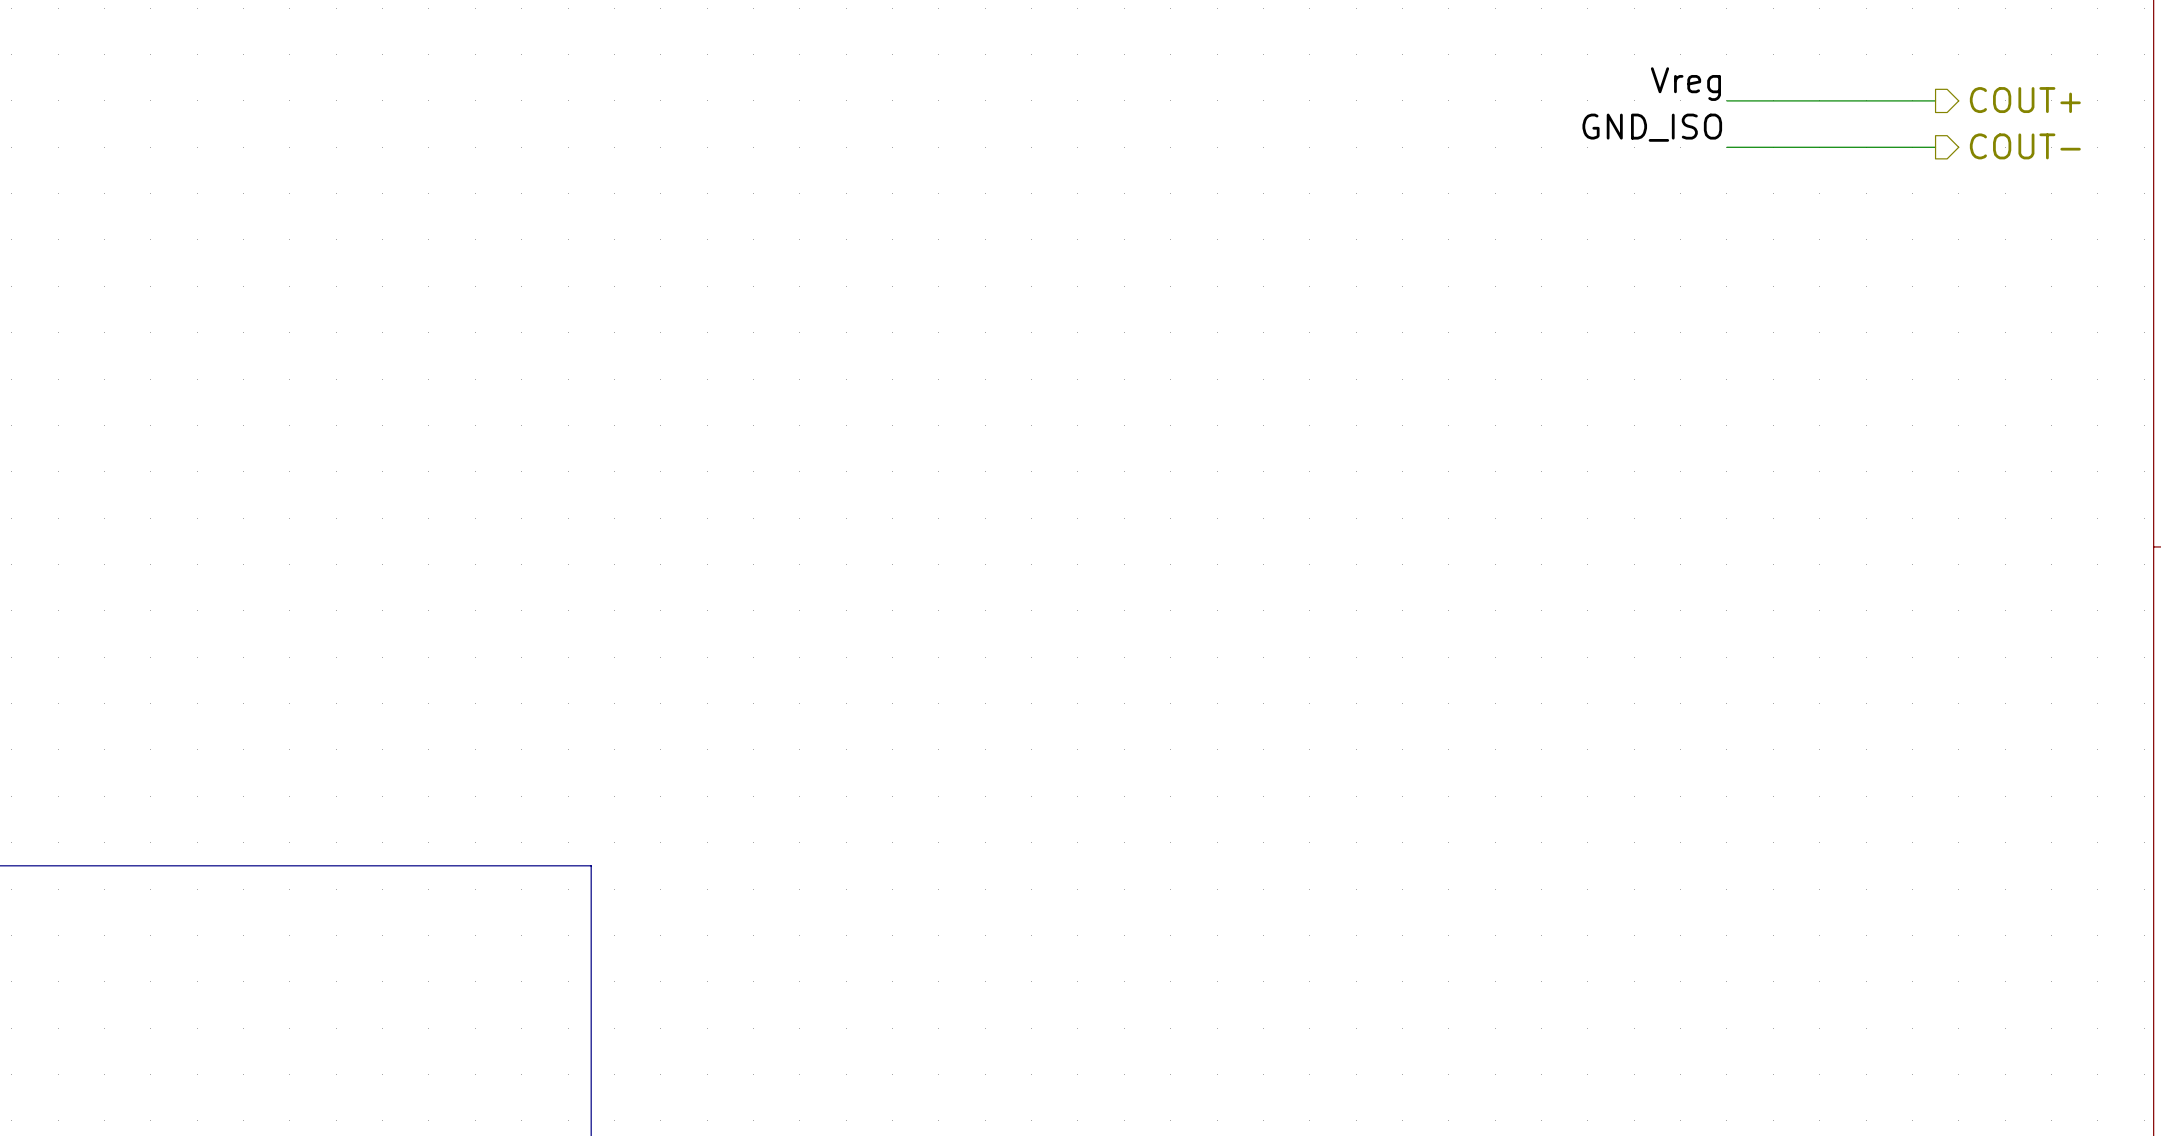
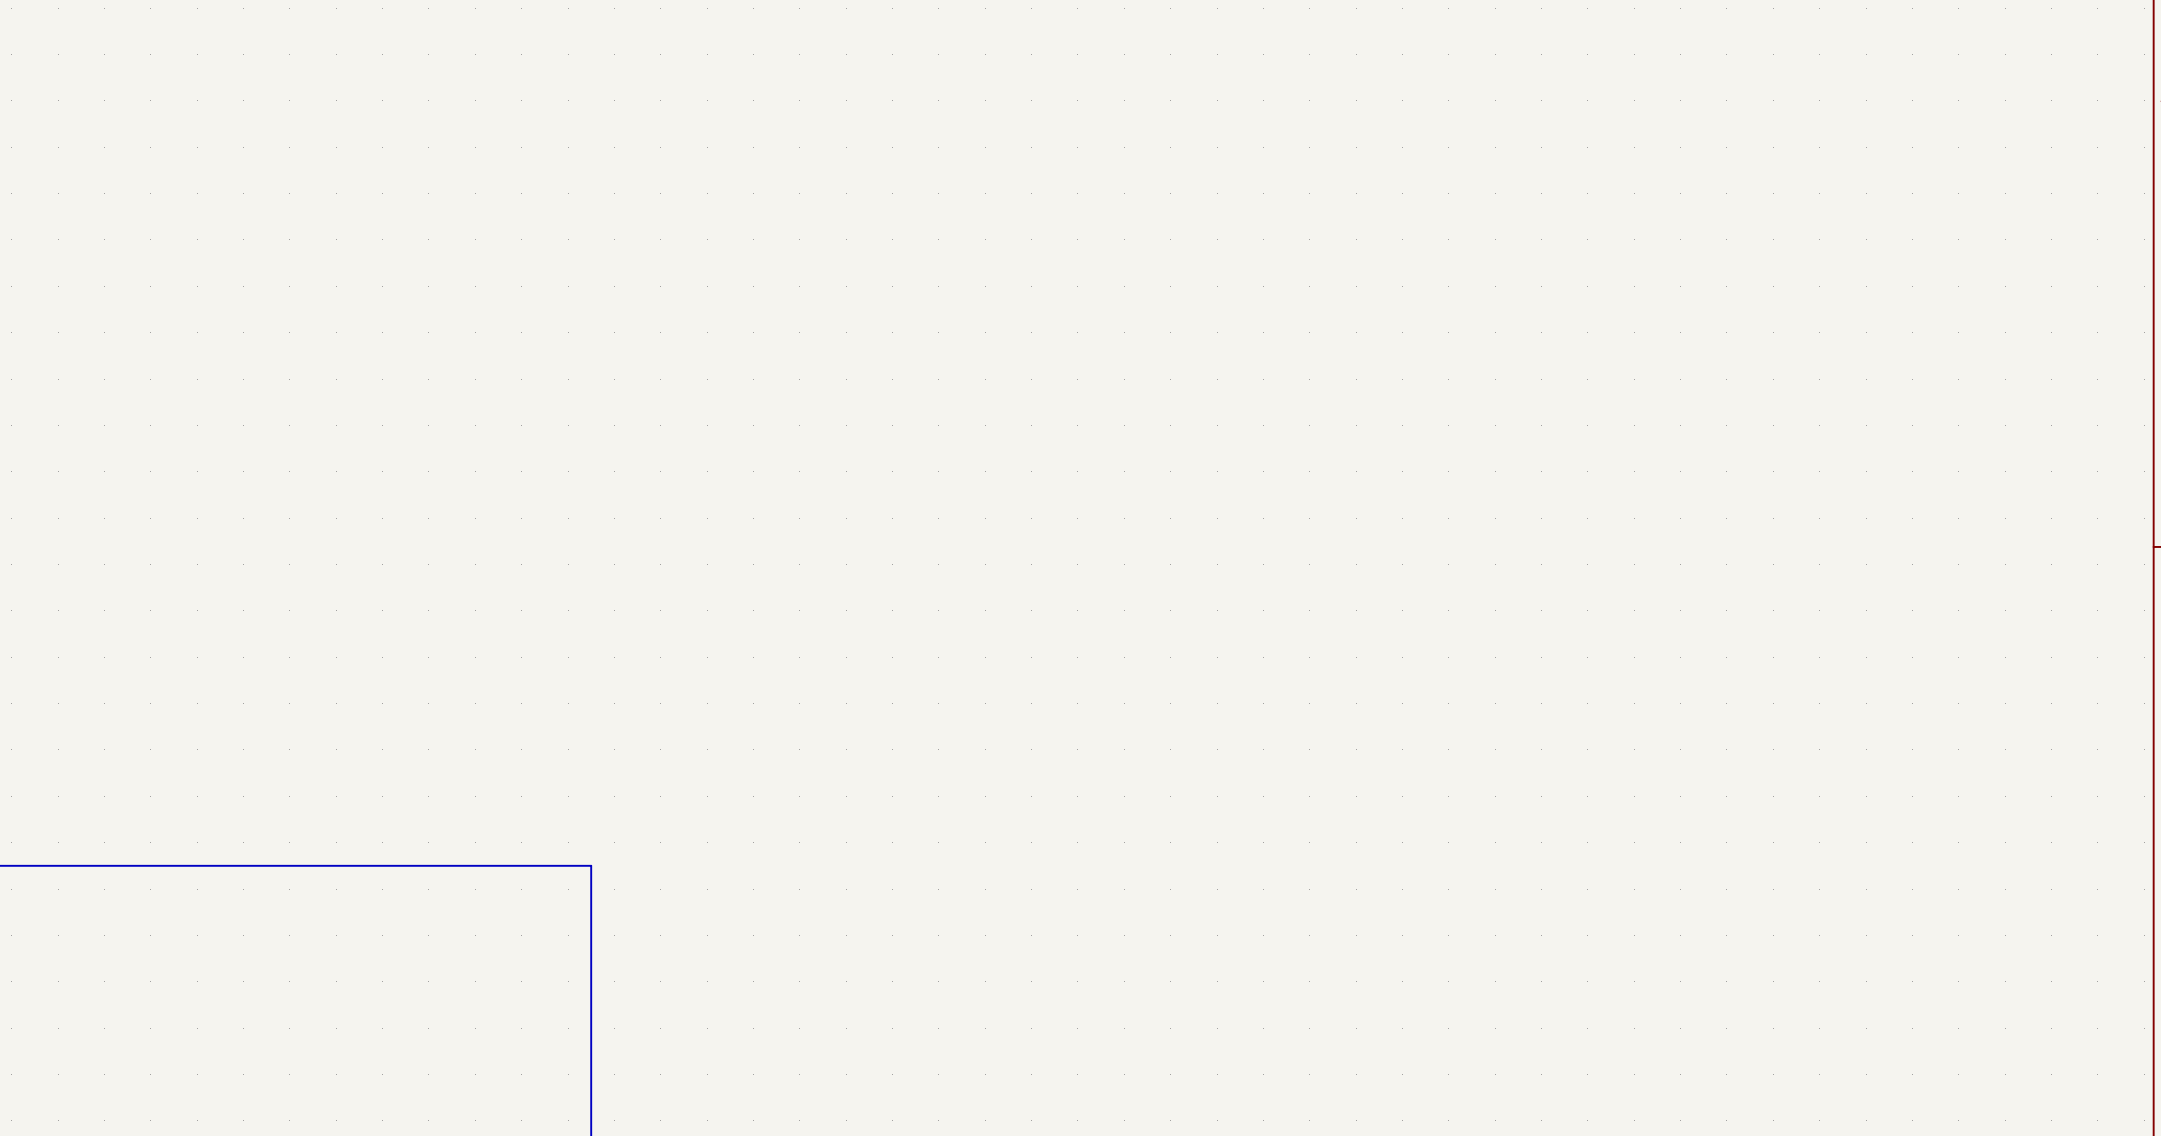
label: Vreg (1685, 84) -> none
wire: (1726, 100) (1935, 100) -> none
hierarchical label: COUT+ (2025, 100) -> none
label: GND_ISO (1652, 127) -> none
hierarchical label: COUT- (2025, 146) -> none
wire: (1726, 147) (1935, 147) -> none

